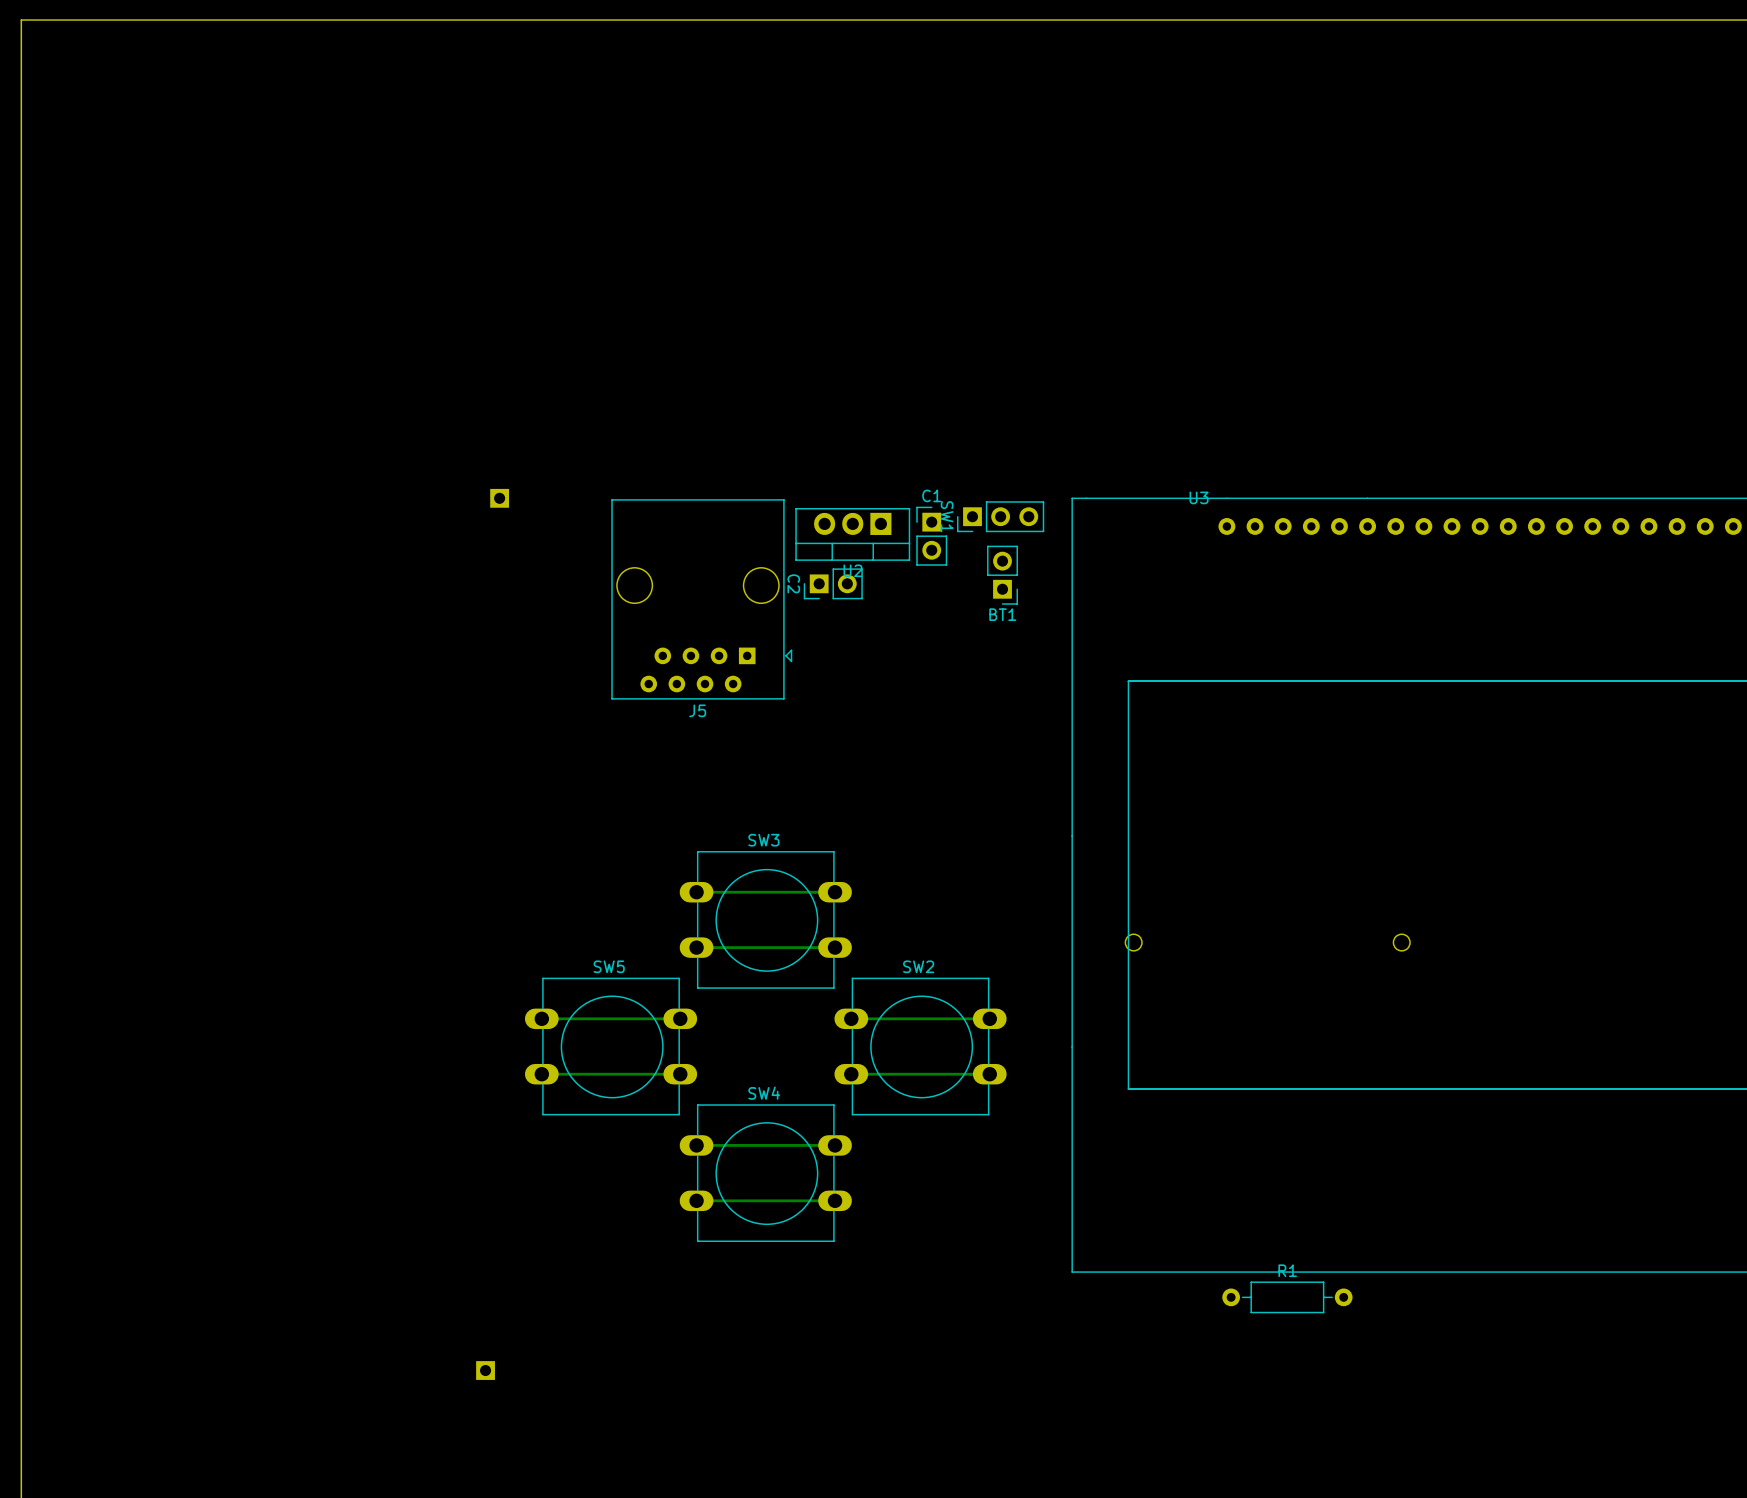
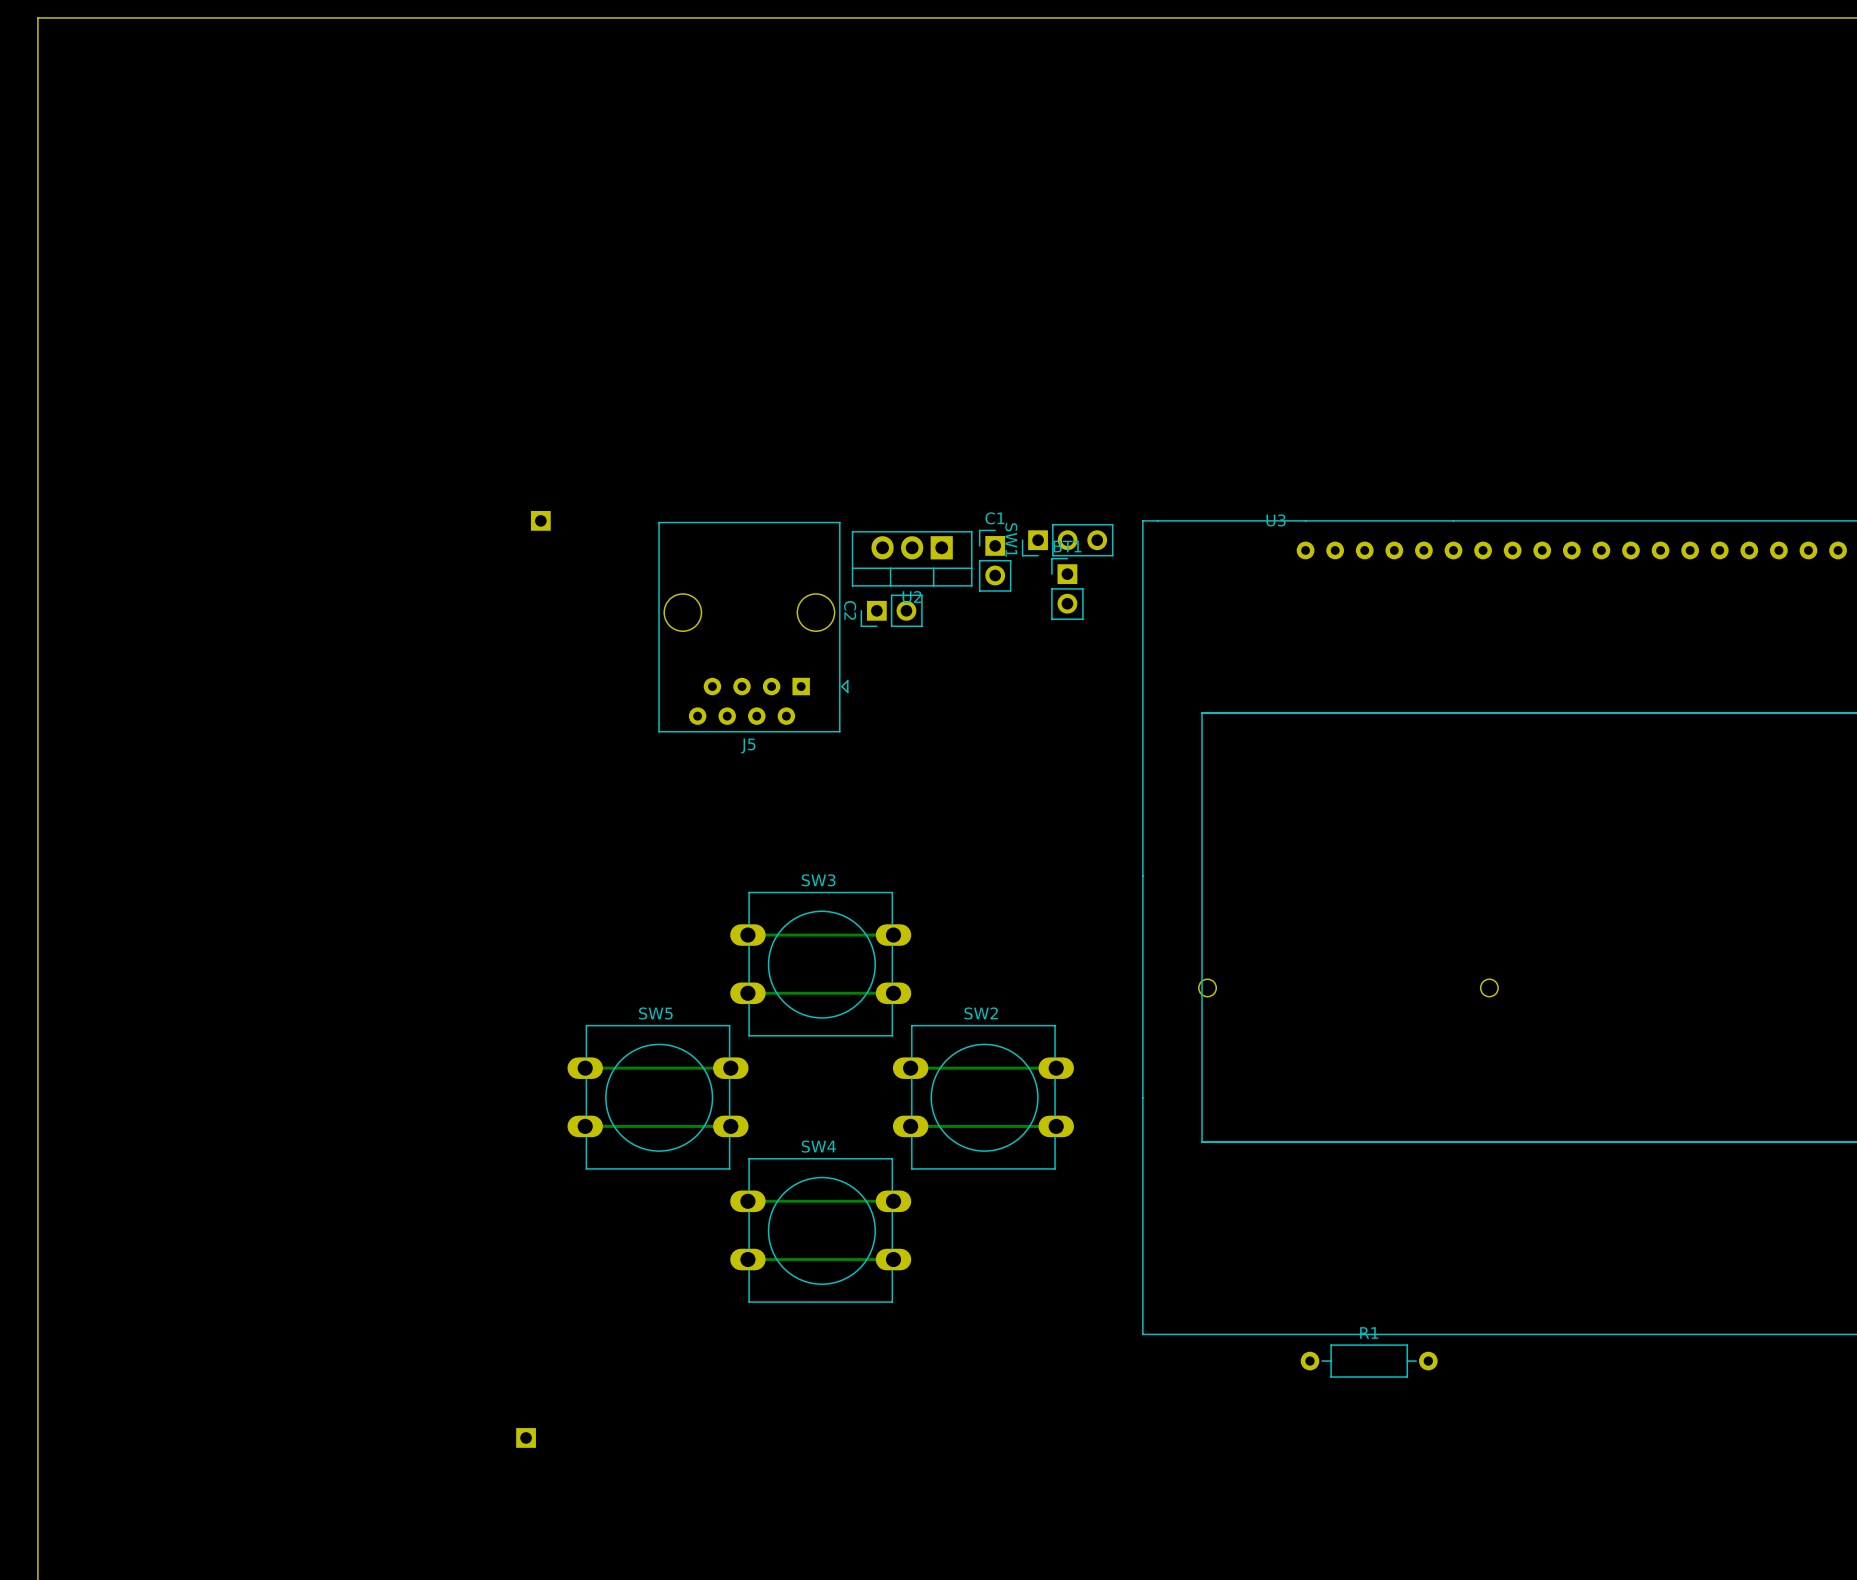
BT1 rotation: 0° (1002, 575) -> 180° (1067, 588)

